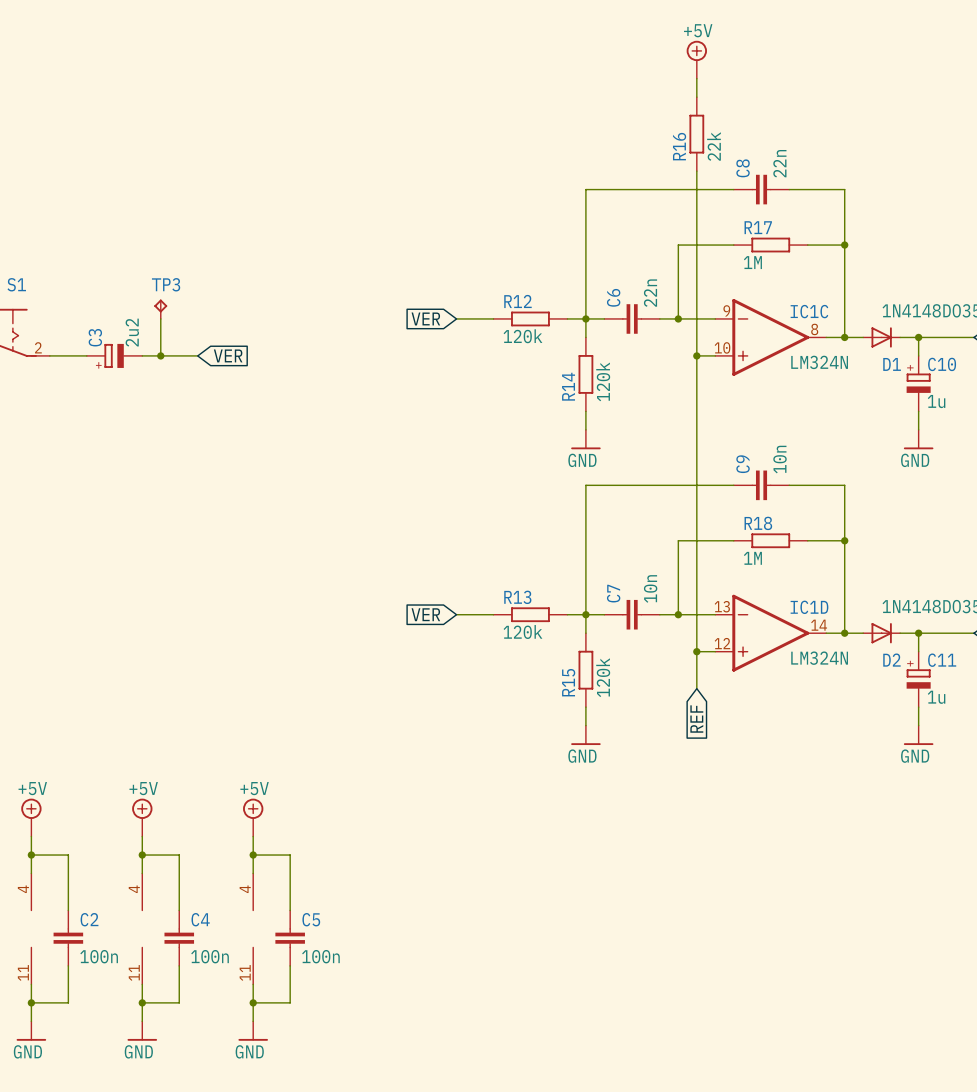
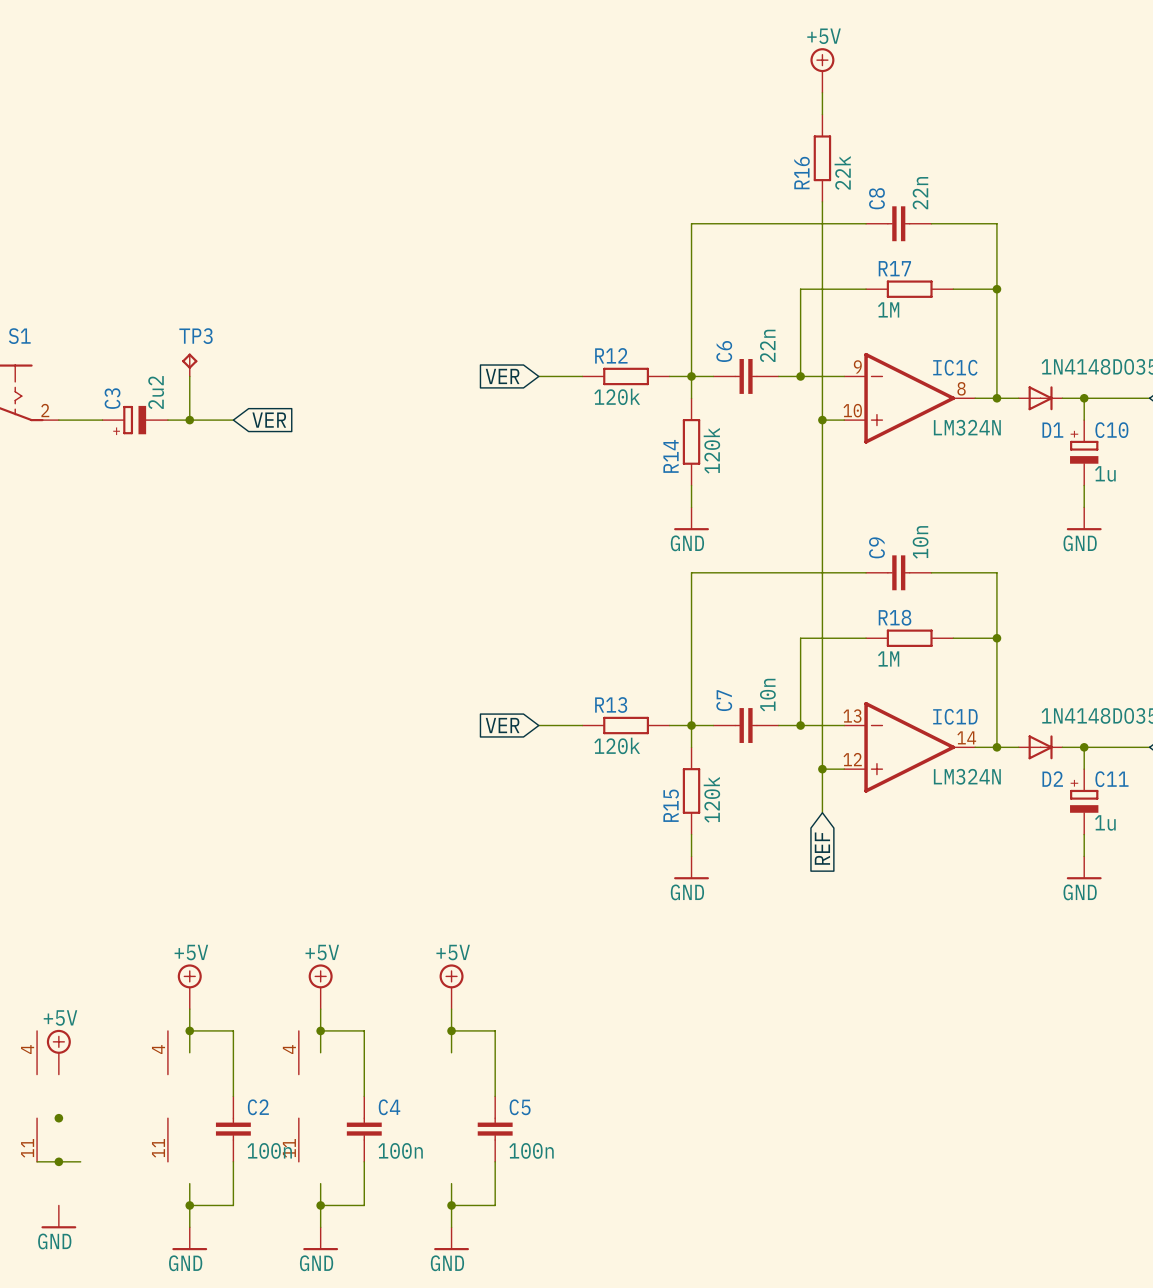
power symbol: +5V (31, 817) -> none
power symbol position: +5V (142, 817) -> +5V (189, 986)
power symbol position: +5V (253, 817) -> +5V (320, 986)
wire: (31, 836) (31, 873) -> (189, 1009) (189, 1052)
wire: (142, 836) (142, 873) -> (320, 1009) (320, 1052)
wire: (253, 836) (253, 873) -> (451, 1009) (451, 1052)
power symbol: none -> +5V (451, 986)
wire: (31, 855) (68, 855) (68, 910) -> (189, 1030) (233, 1030) (233, 1096)
junction: (31, 855) -> none
wire: (142, 855) (179, 855) (179, 910) -> (320, 1030) (364, 1030) (364, 1096)
junction position: (142, 855) -> (189, 1030)
wire: (253, 855) (290, 855) (290, 910) -> (451, 1030) (495, 1030) (495, 1096)
junction position: (253, 855) -> (320, 1030)
junction: none -> (451, 1030)
power symbol: none -> +5V (58, 1052)
C2 position: (68, 938) -> (233, 1129)
C4 position: (179, 938) -> (364, 1129)
C5 position: (290, 938) -> (495, 1129)
junction: none -> (58, 1118)
wire: (68, 965) (68, 1002) (31, 1002) -> (233, 1161) (233, 1205) (189, 1205)
wire: (179, 965) (179, 1002) (142, 1002) -> (364, 1161) (364, 1205) (320, 1205)
wire: (290, 965) (290, 1002) (253, 1002) -> (495, 1161) (495, 1205) (451, 1205)
wire: (31, 984) (31, 1021) -> (37, 1161) (80, 1161)
wire: (142, 984) (142, 1021) -> (320, 1183) (320, 1227)
wire: (253, 984) (253, 1021) -> (451, 1183) (451, 1227)
junction position: (31, 1002) -> (58, 1161)
junction position: (142, 1002) -> (189, 1205)
wire: none -> (189, 1183) (189, 1227)
junction position: (253, 1002) -> (320, 1205)
junction: none -> (451, 1205)
power symbol position: GND (31, 1031) -> GND (58, 1216)
power symbol position: GND (142, 1031) -> GND (189, 1238)
power symbol position: GND (253, 1031) -> GND (320, 1238)
power symbol: none -> GND (451, 1238)

